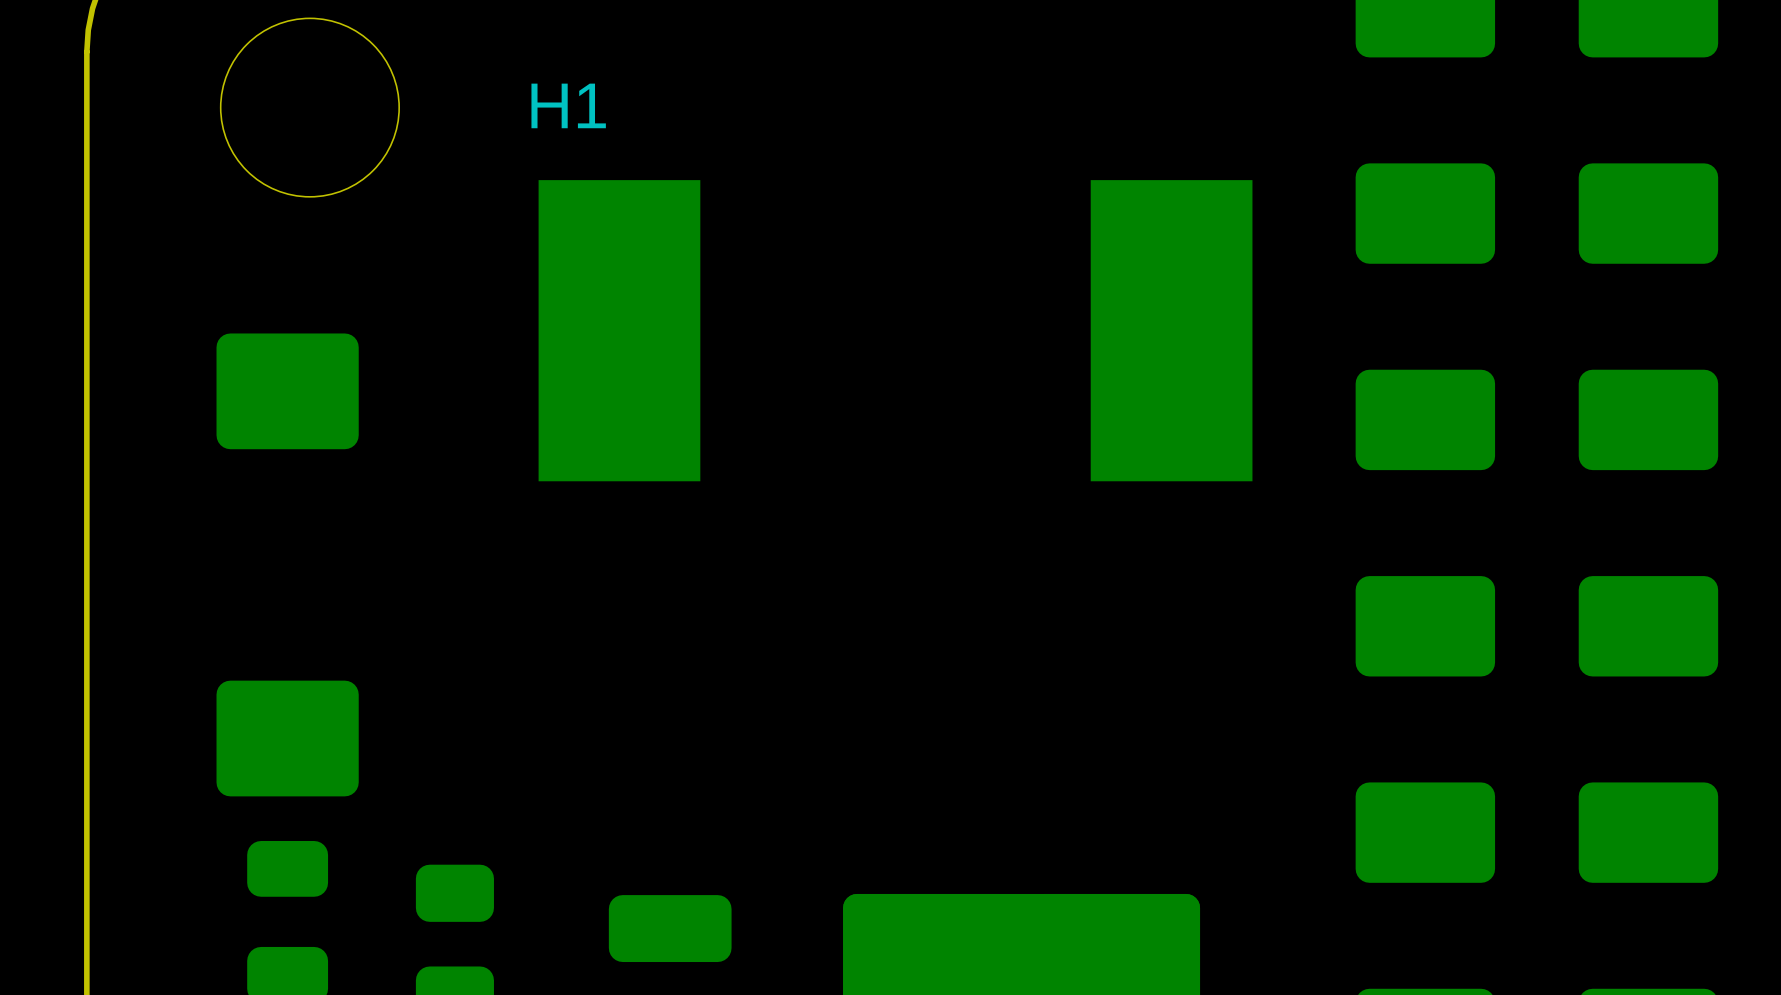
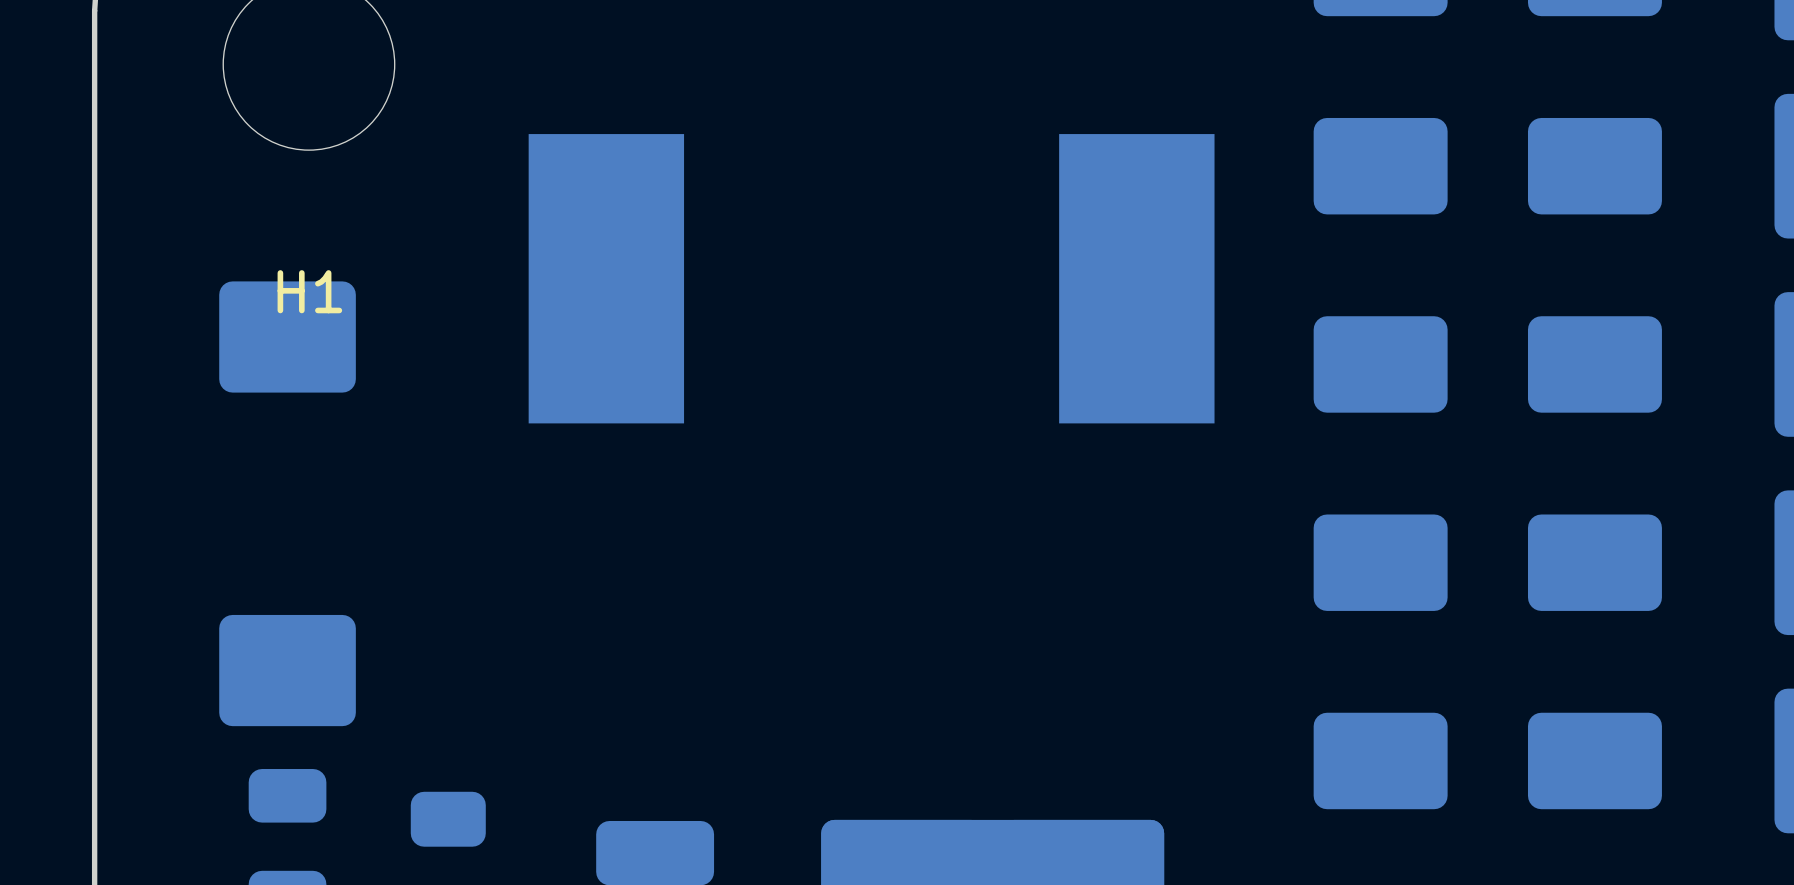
H1 name position: H1 (568, 105) -> H1 (309, 291)

